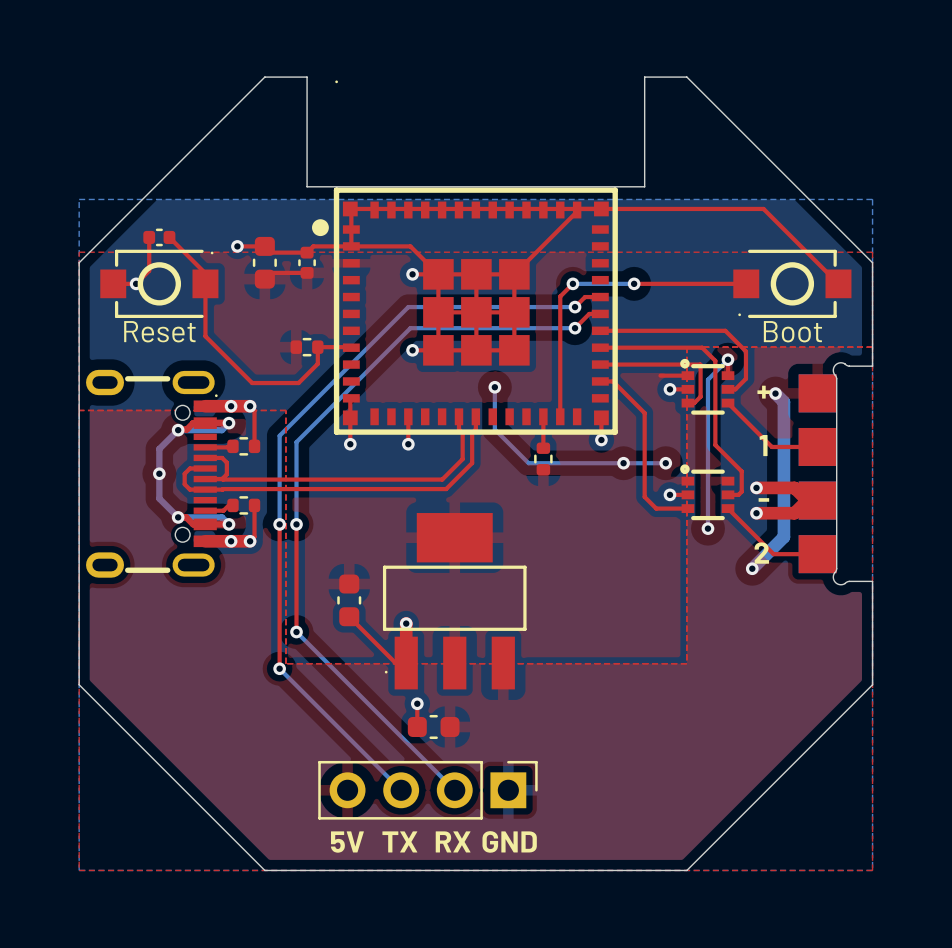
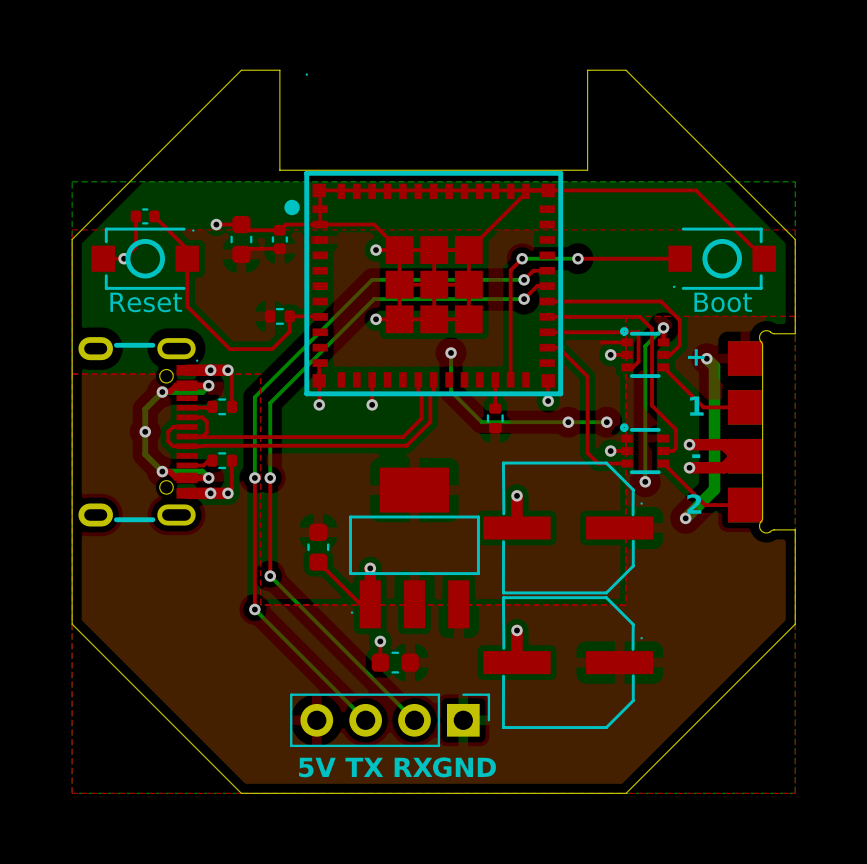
top track: none -> (517, 495) (517, 527)
via: none -> (517, 495)
part: none -> (568, 527)
top track: none -> (517, 630) (517, 662)
via: none -> (517, 630)
part: none -> (568, 662)

